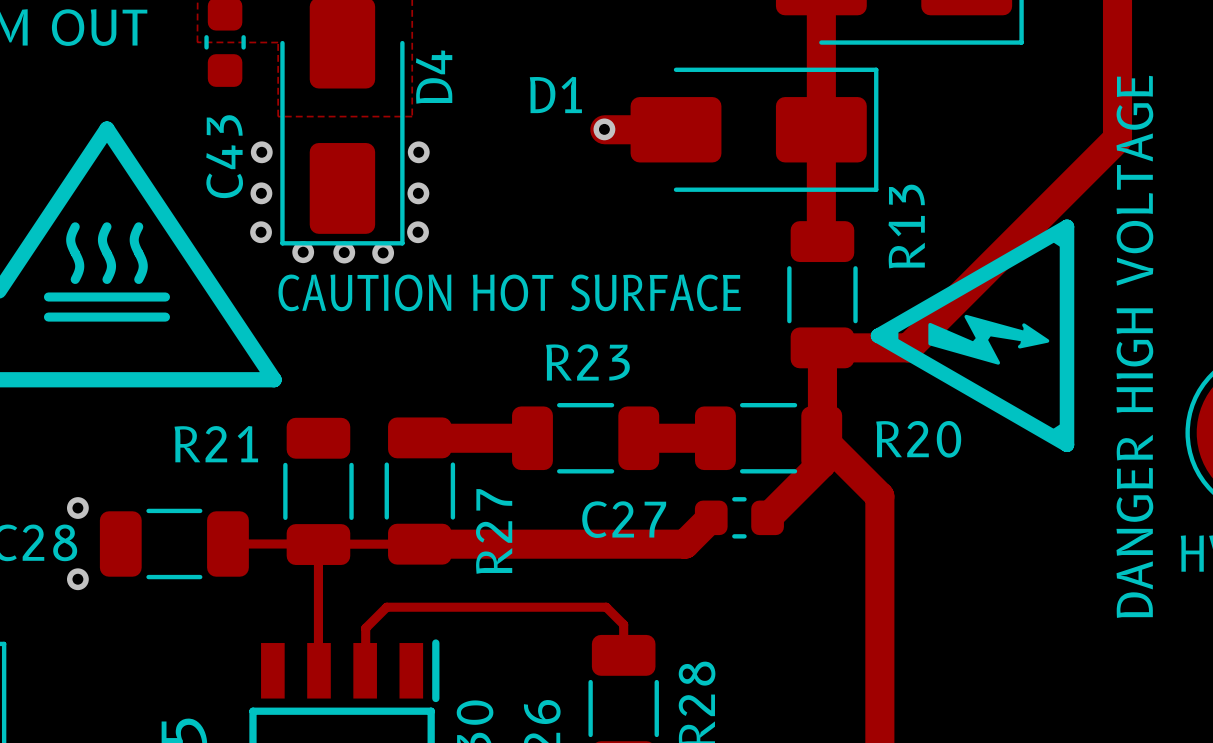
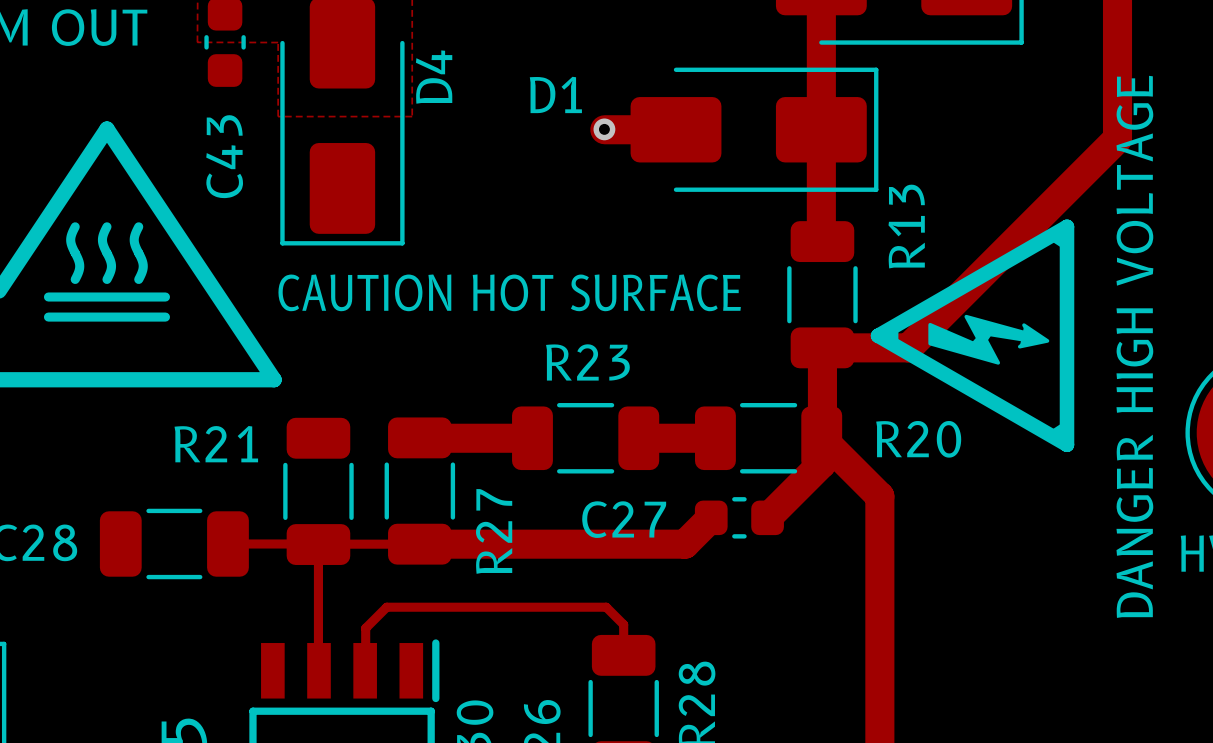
via: (261, 152) -> none
via: (418, 152) -> none
via: (261, 193) -> none
via: (418, 193) -> none
via: (261, 232) -> none
via: (418, 232) -> none
via: (303, 252) -> none
via: (344, 252) -> none
via: (383, 252) -> none
via: (77, 508) -> none
via: (77, 579) -> none

